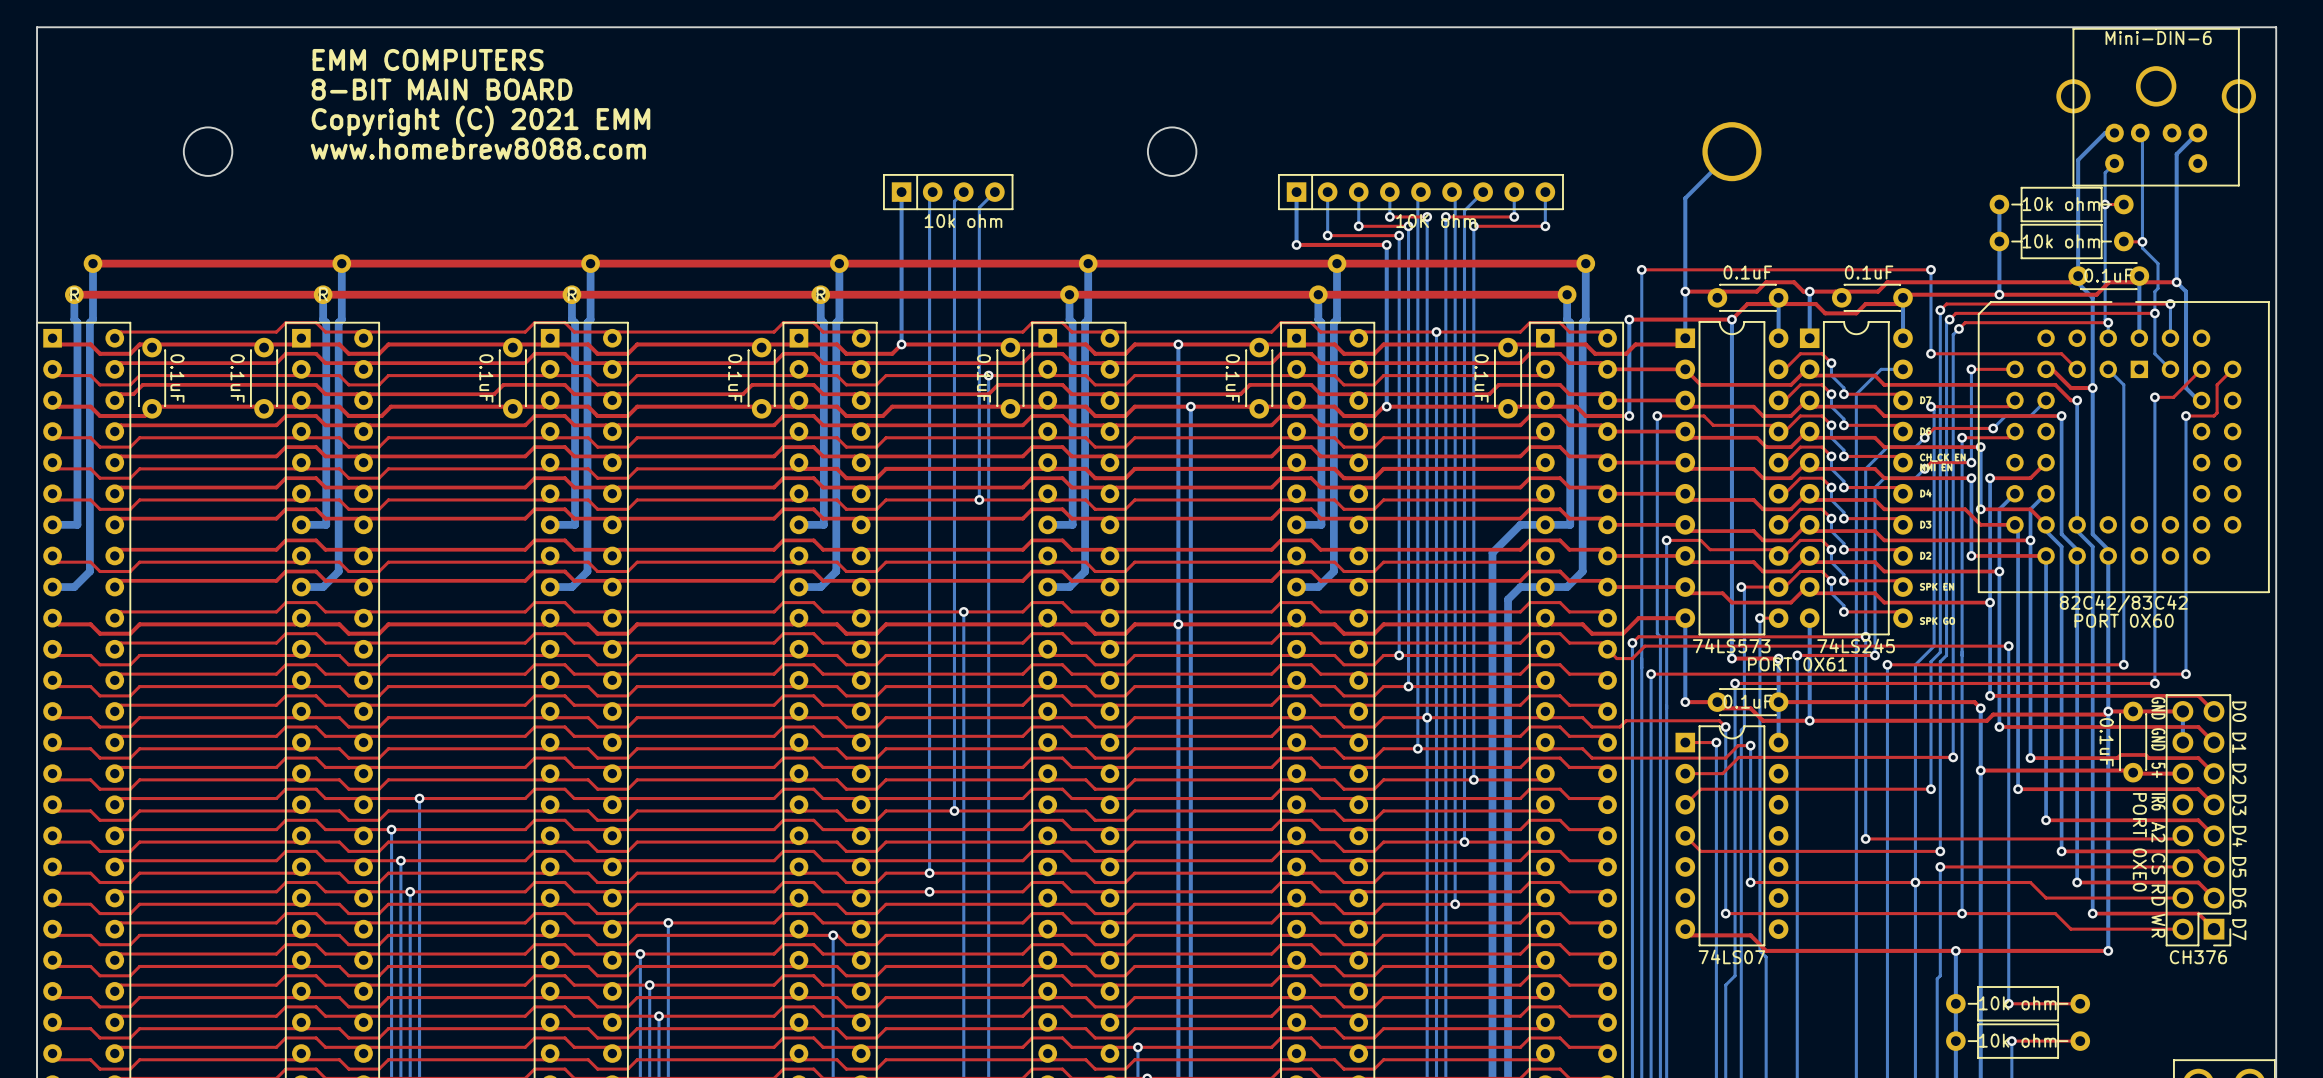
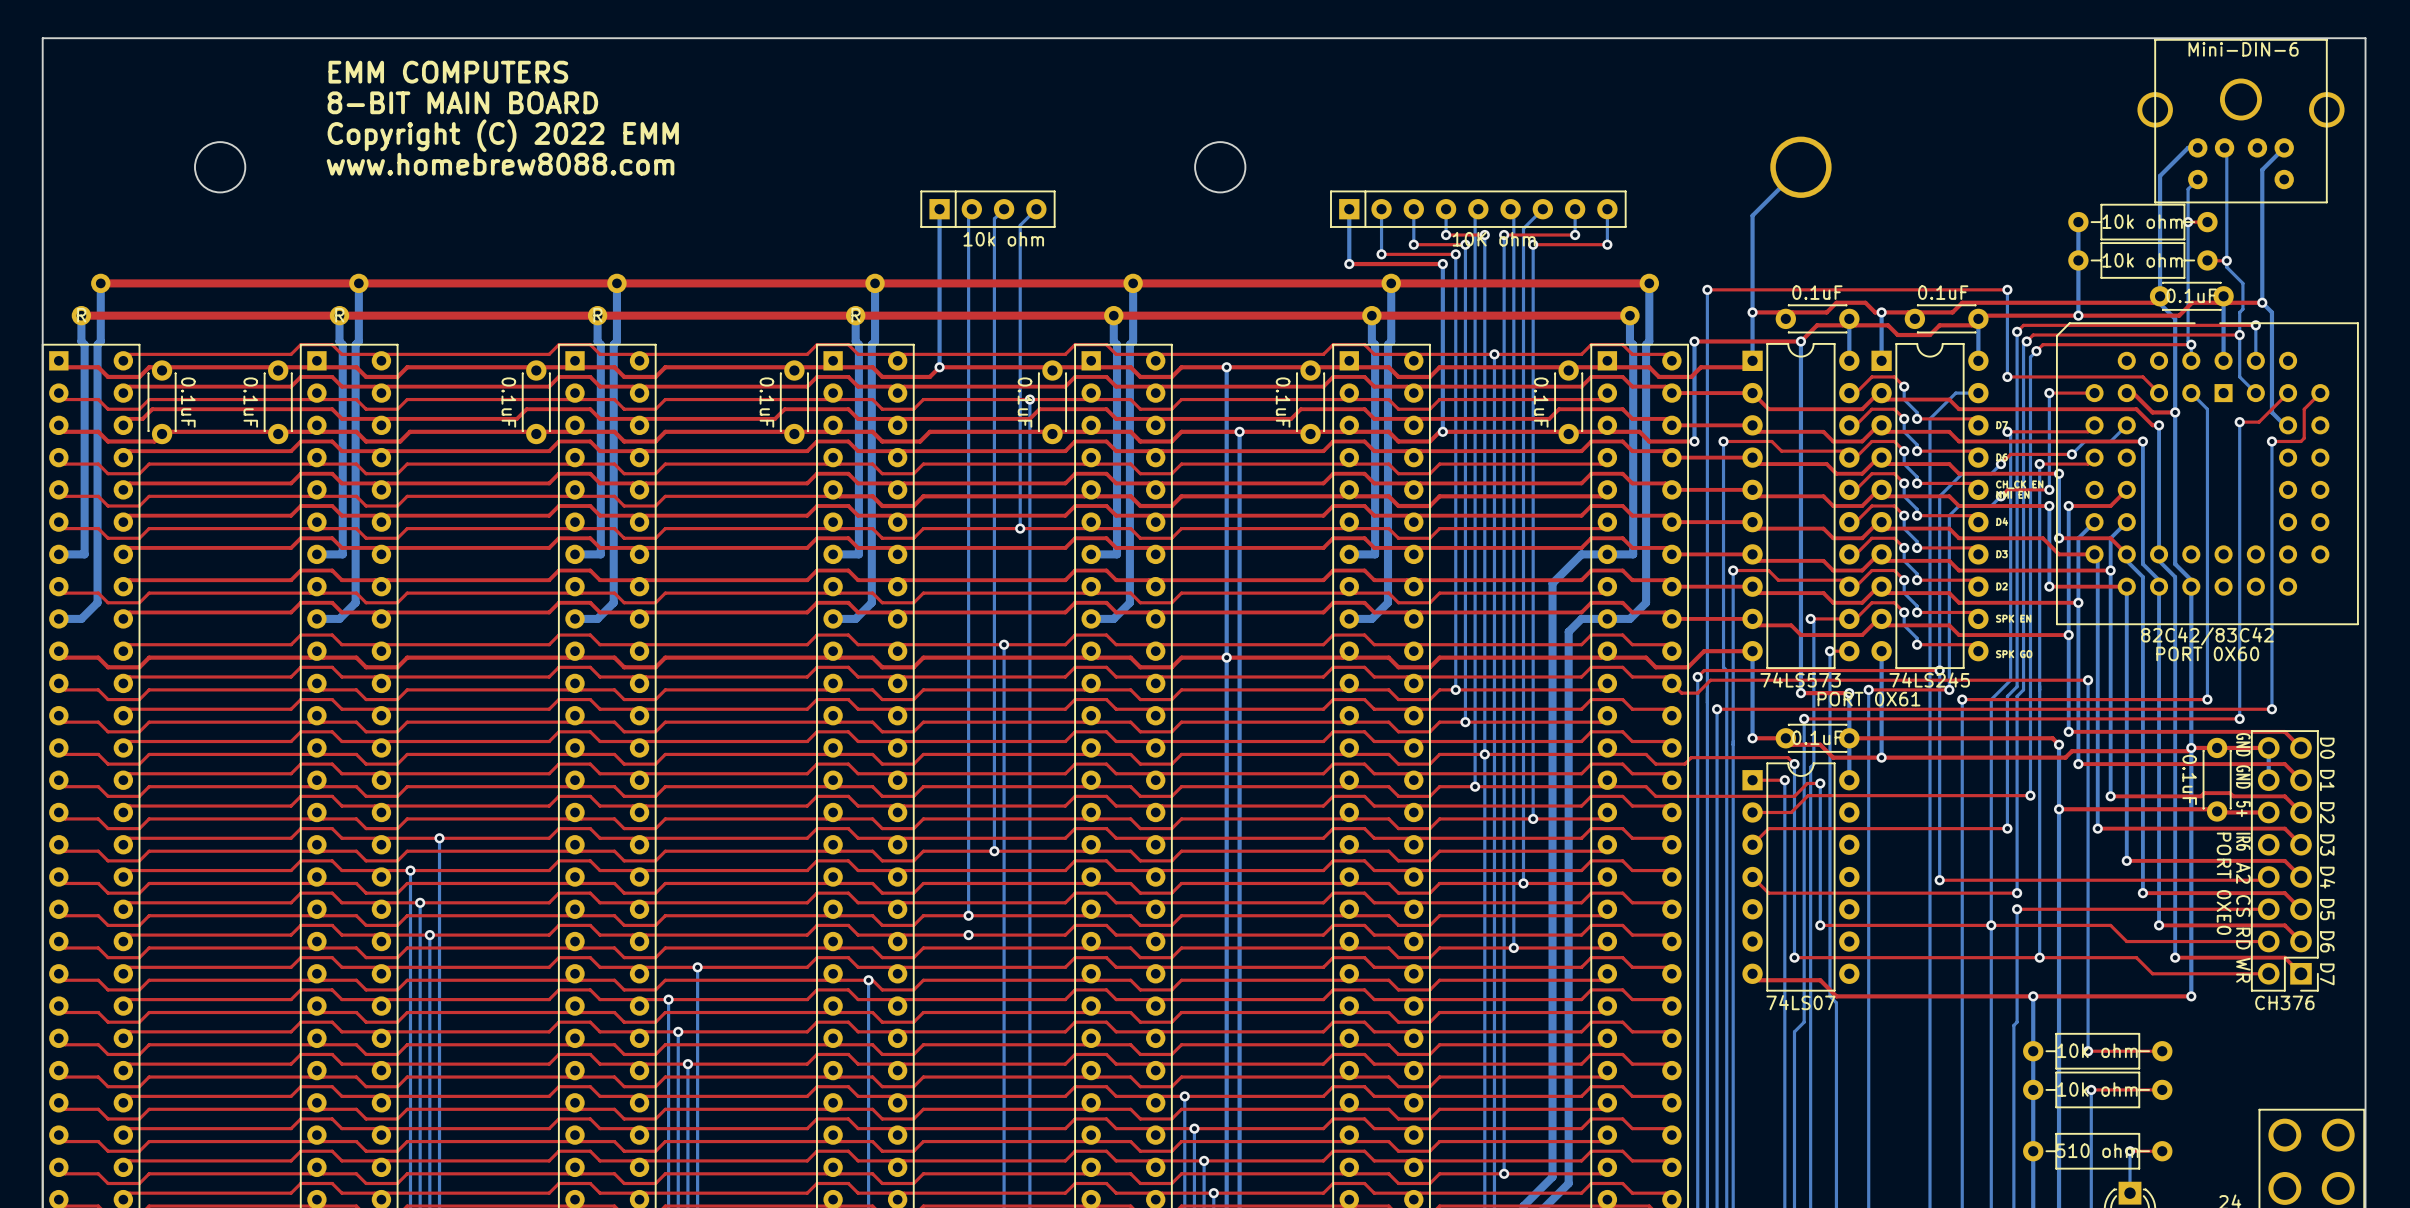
text: Copyright (C) 2021 EMM (480, 121) -> Copyright (C) 2022 EMM (503, 135)

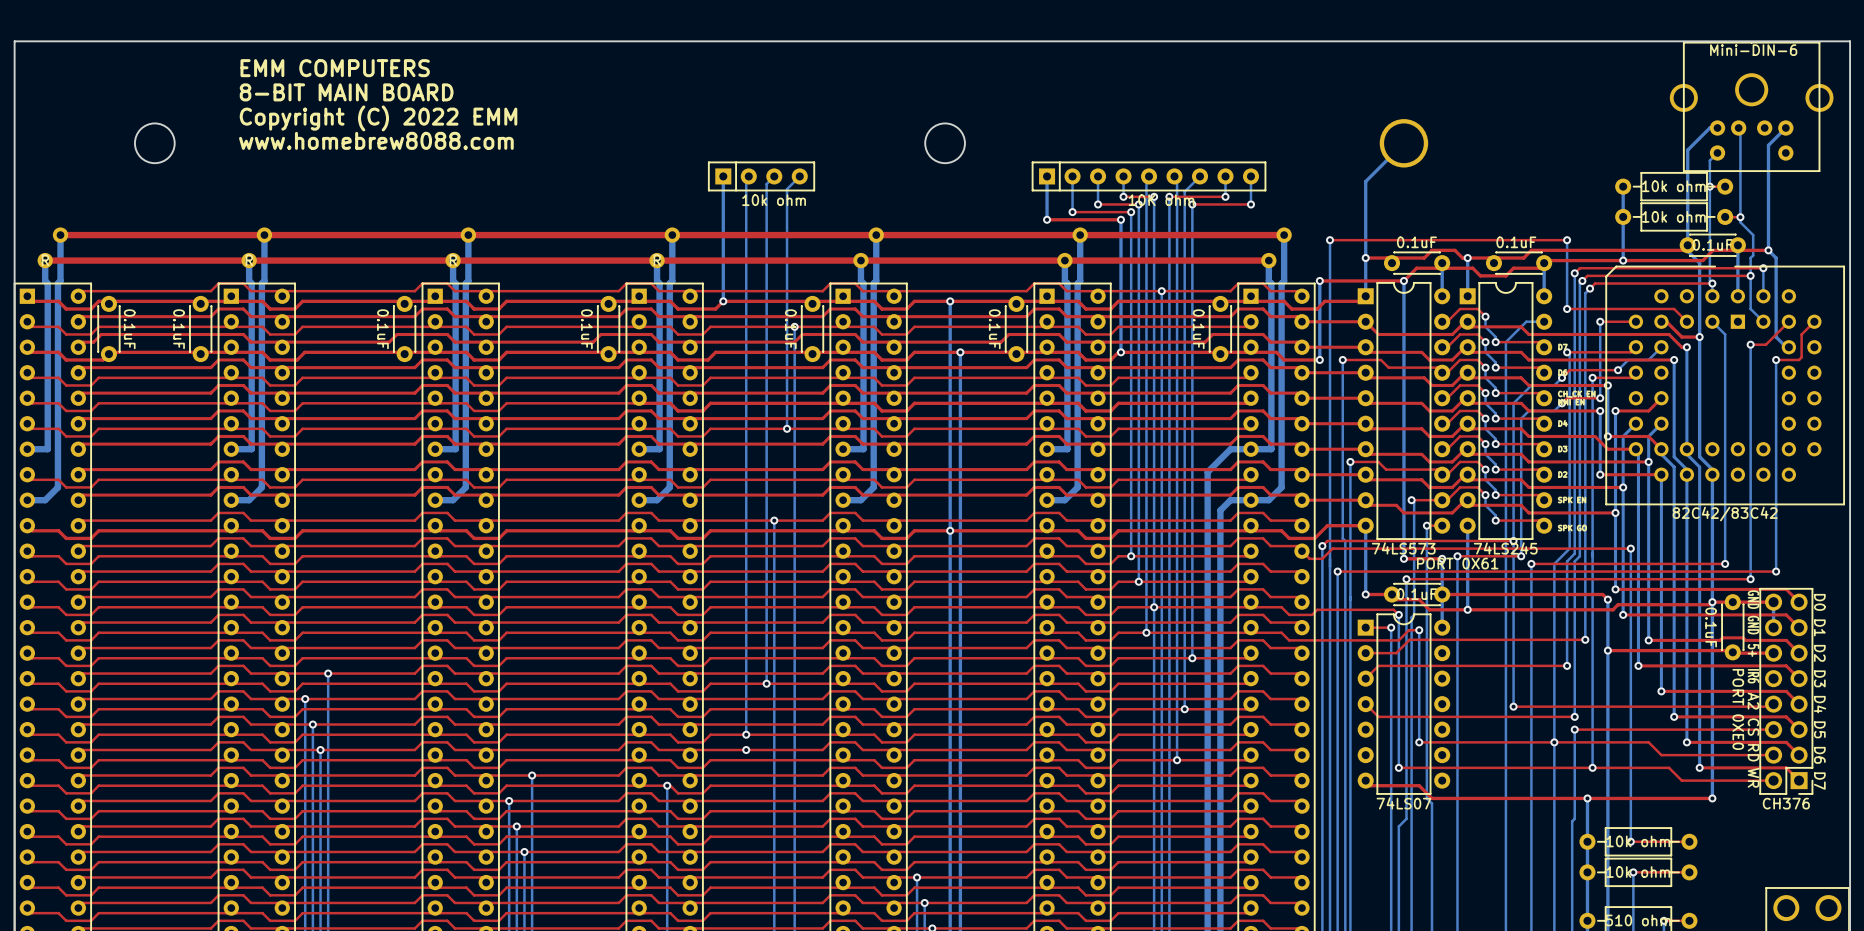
drawing: [2156, 646, 2260, 662] -> none

